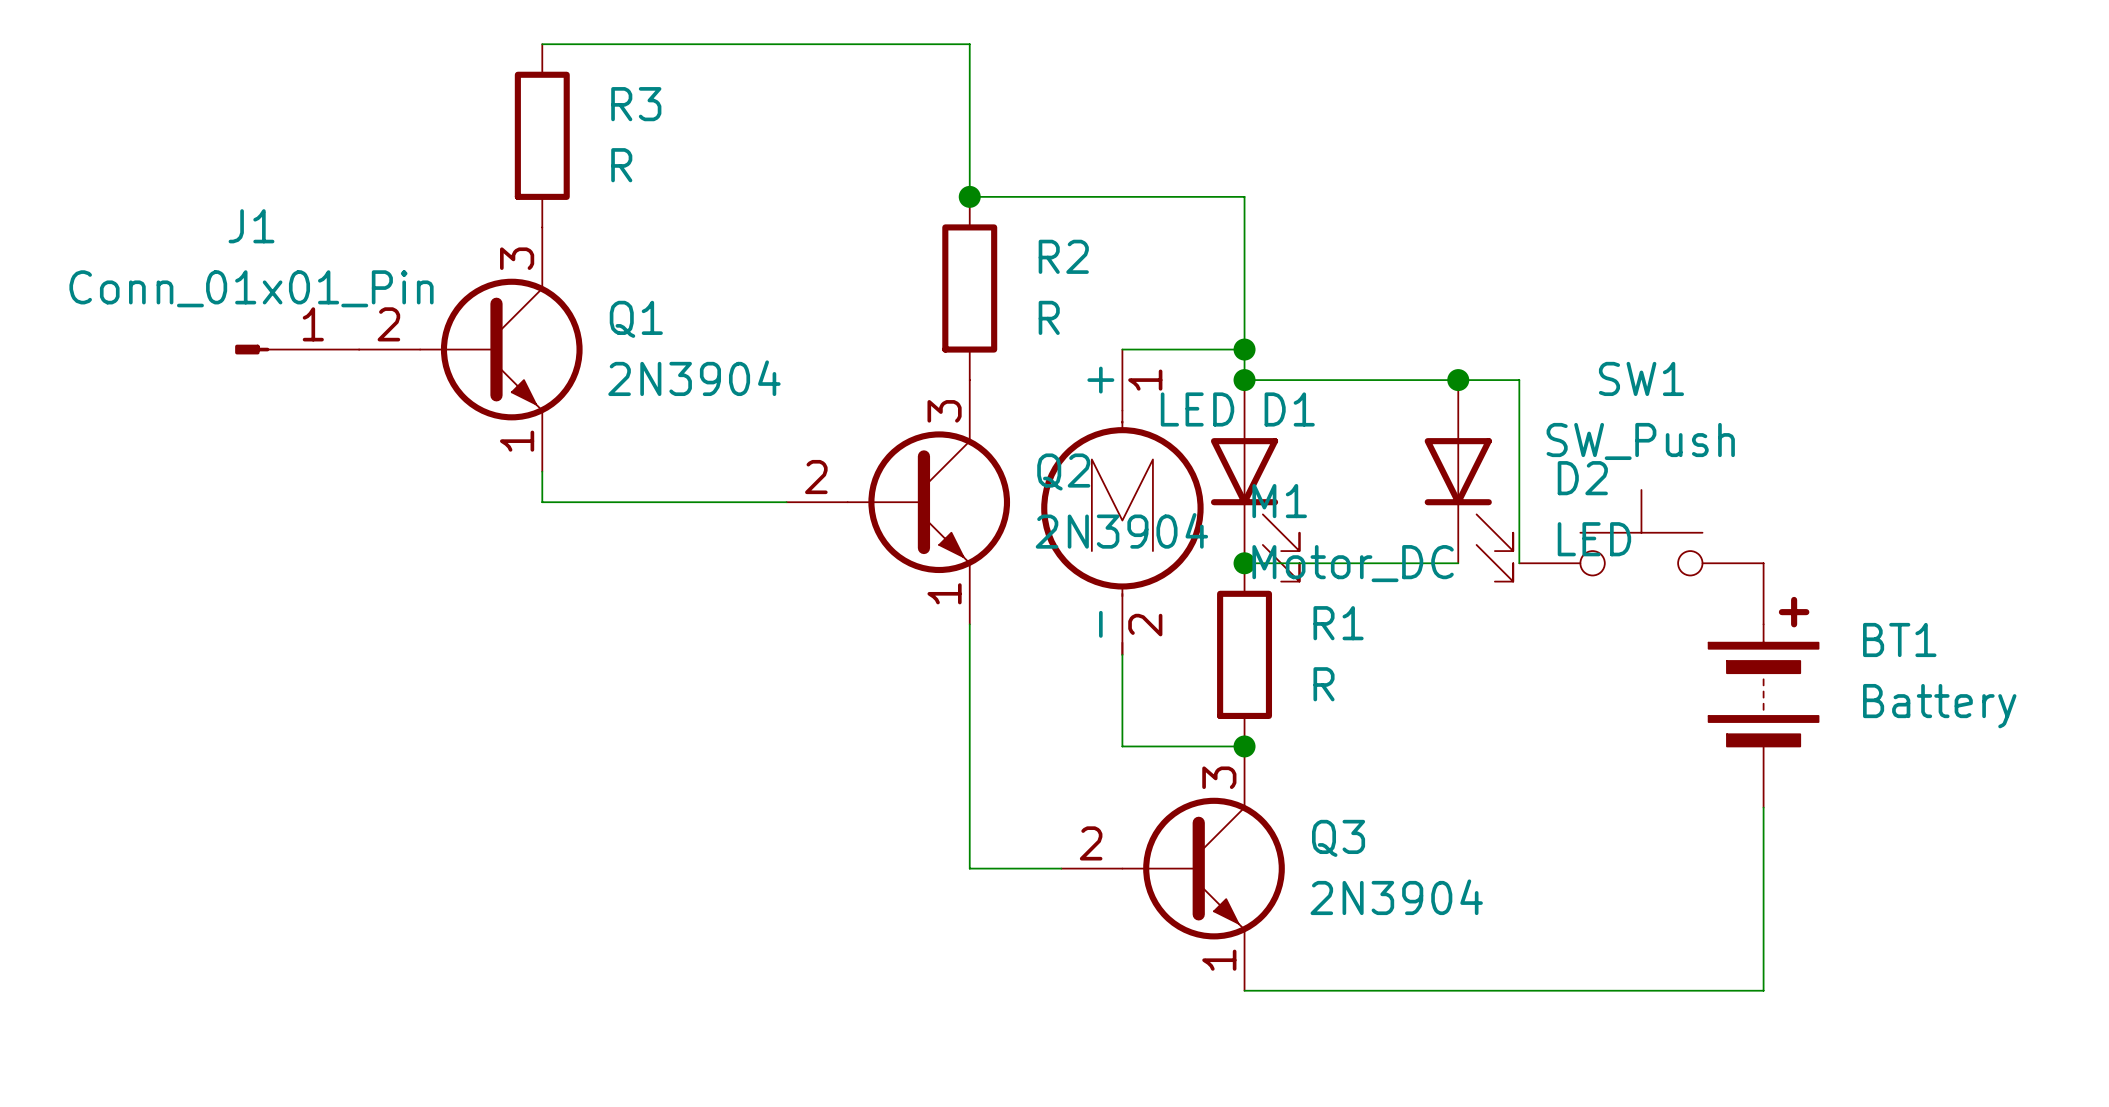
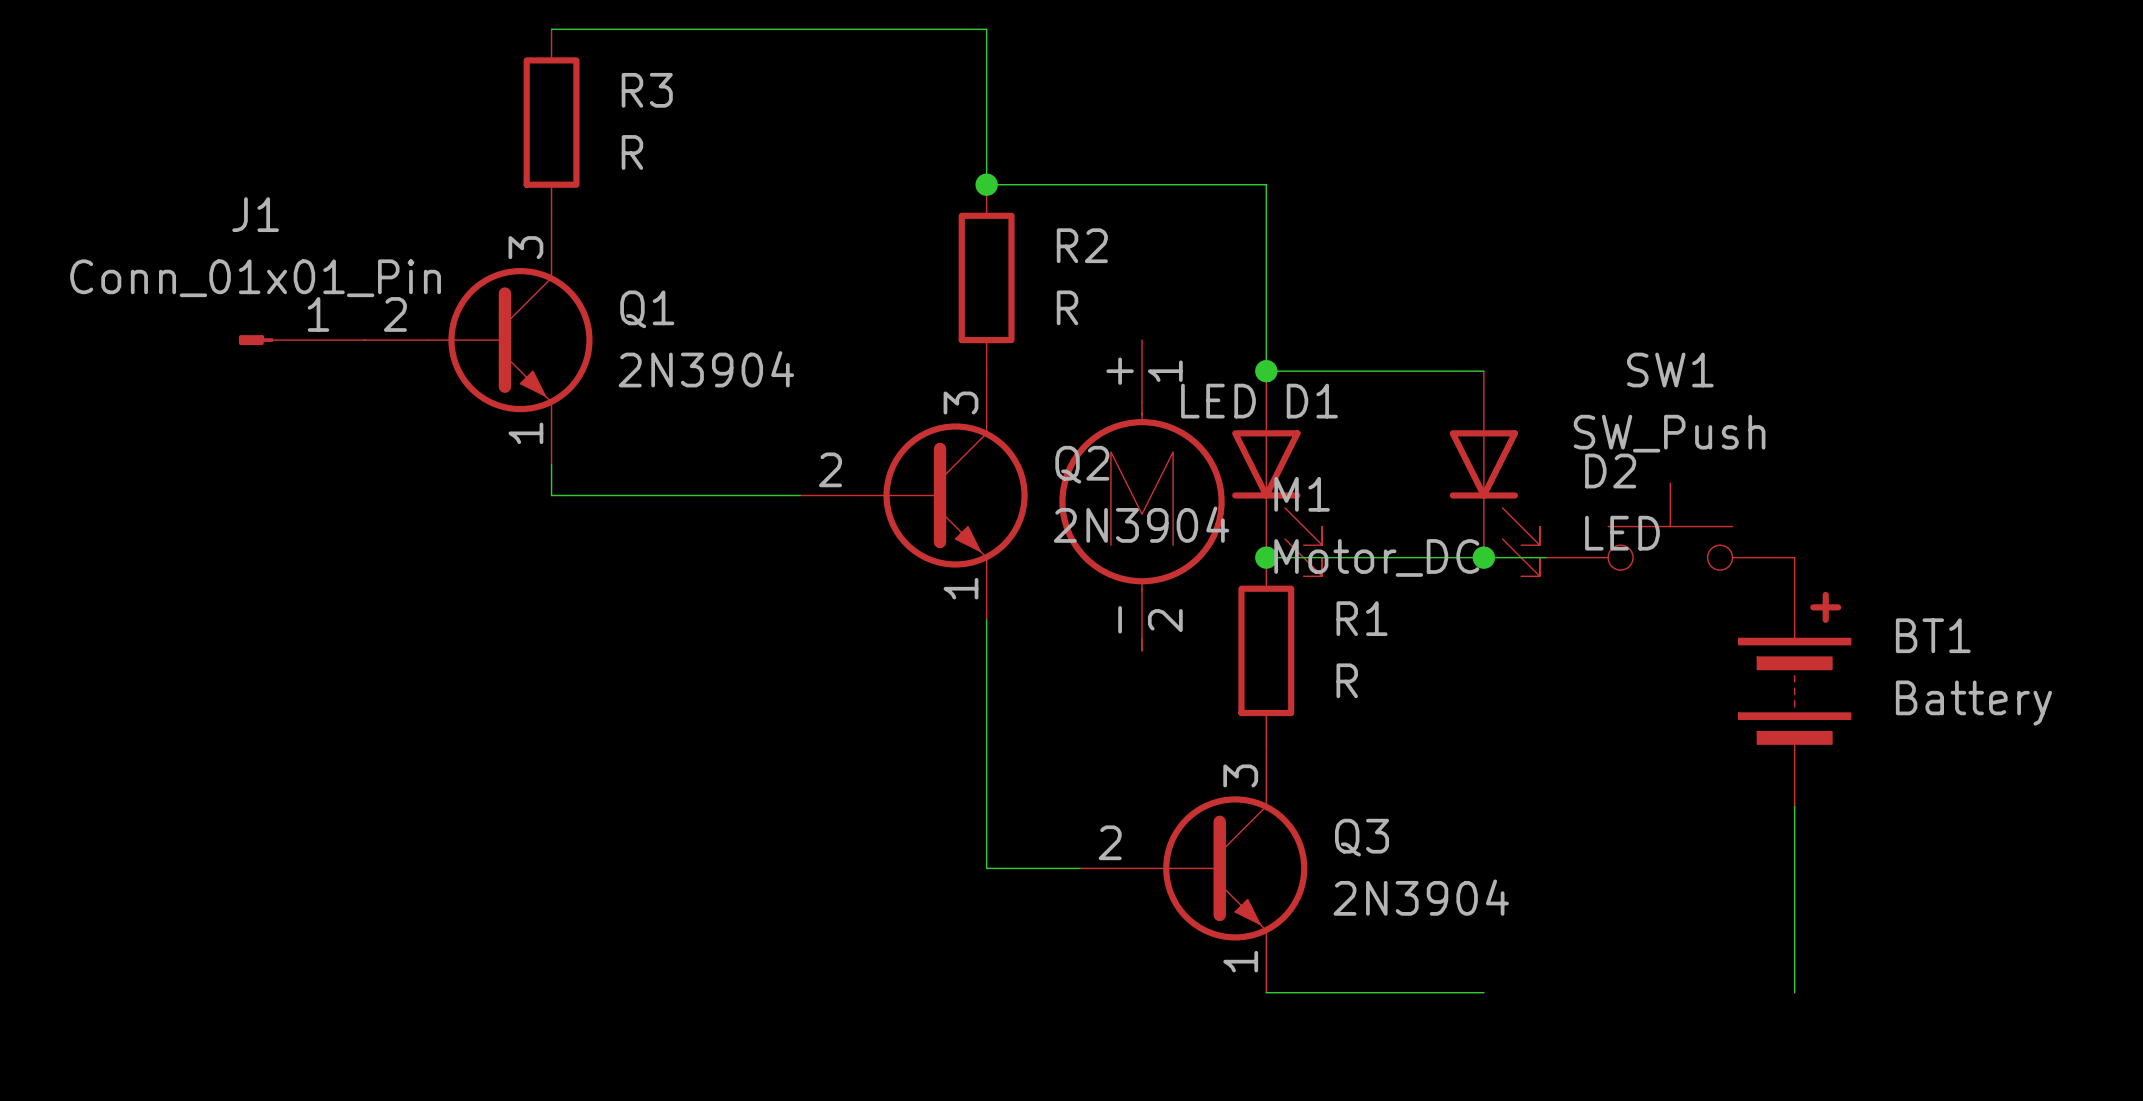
wire: (1122, 349) (1244, 349) -> none
junction: (1244, 349) -> none
wire: (1458, 380) (1519, 380) (1519, 563) -> (1483, 557) (1546, 557)
junction: (1458, 380) -> none
junction: none -> (1483, 557)
wire: (1122, 654) (1122, 746) (1244, 746) -> none
junction: (1244, 746) -> none
wire: (1458, 990) (1763, 990) -> none

